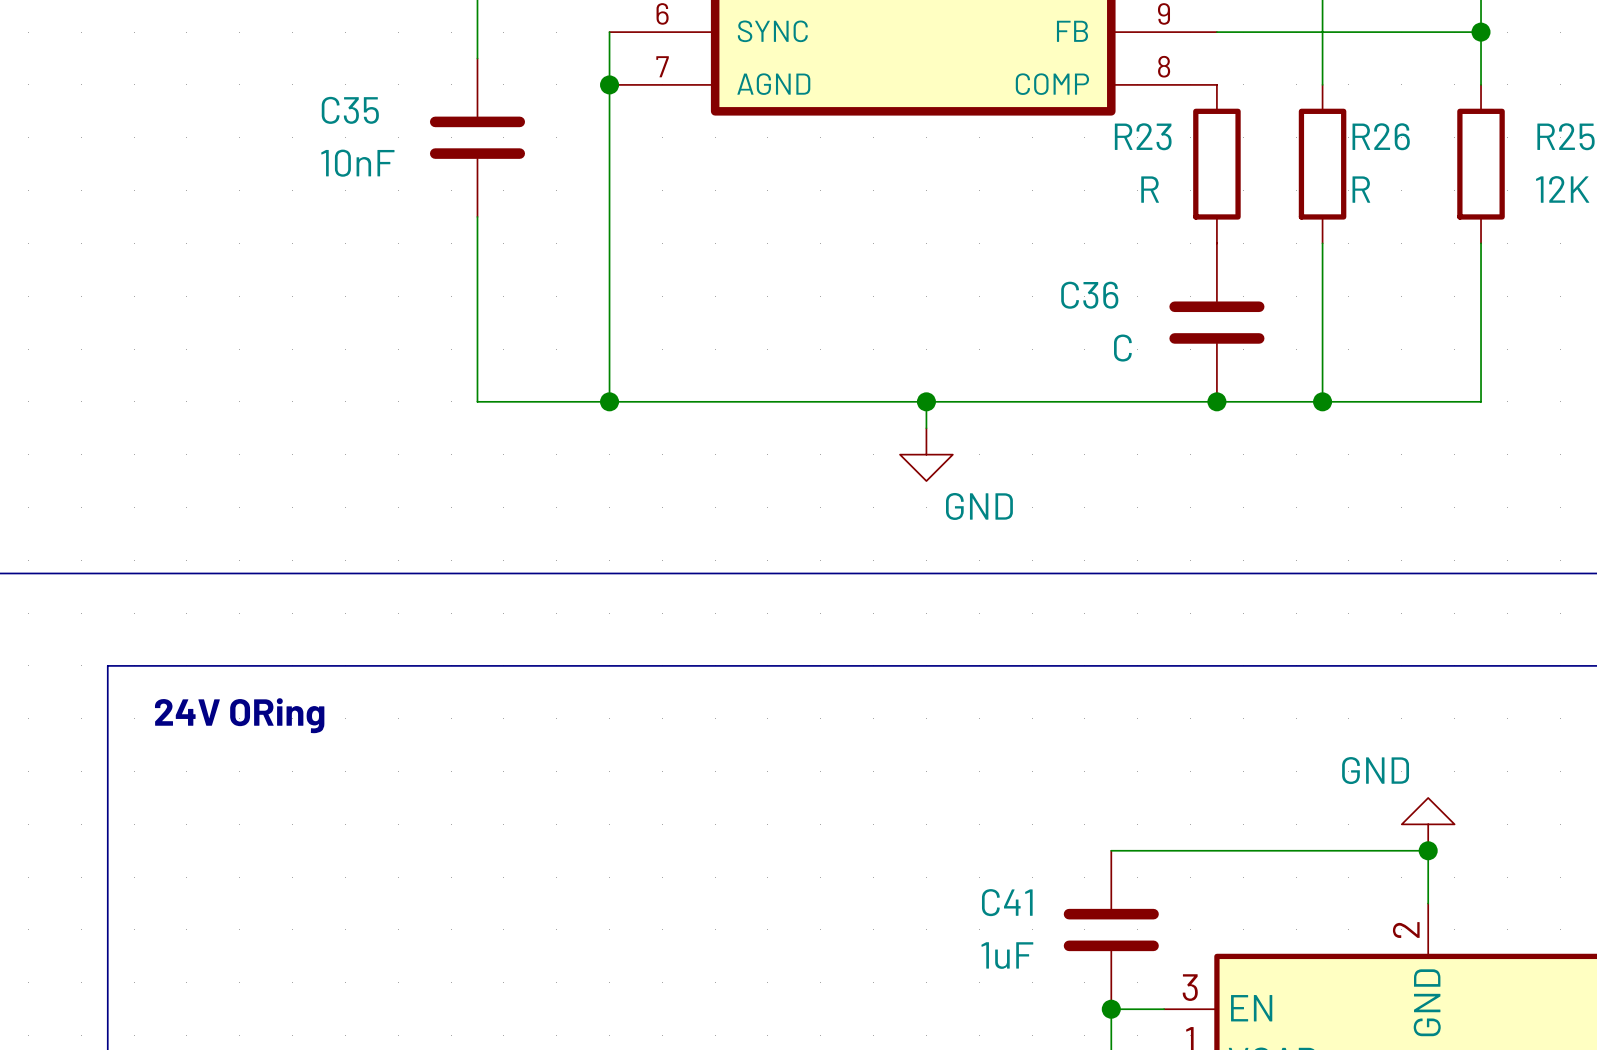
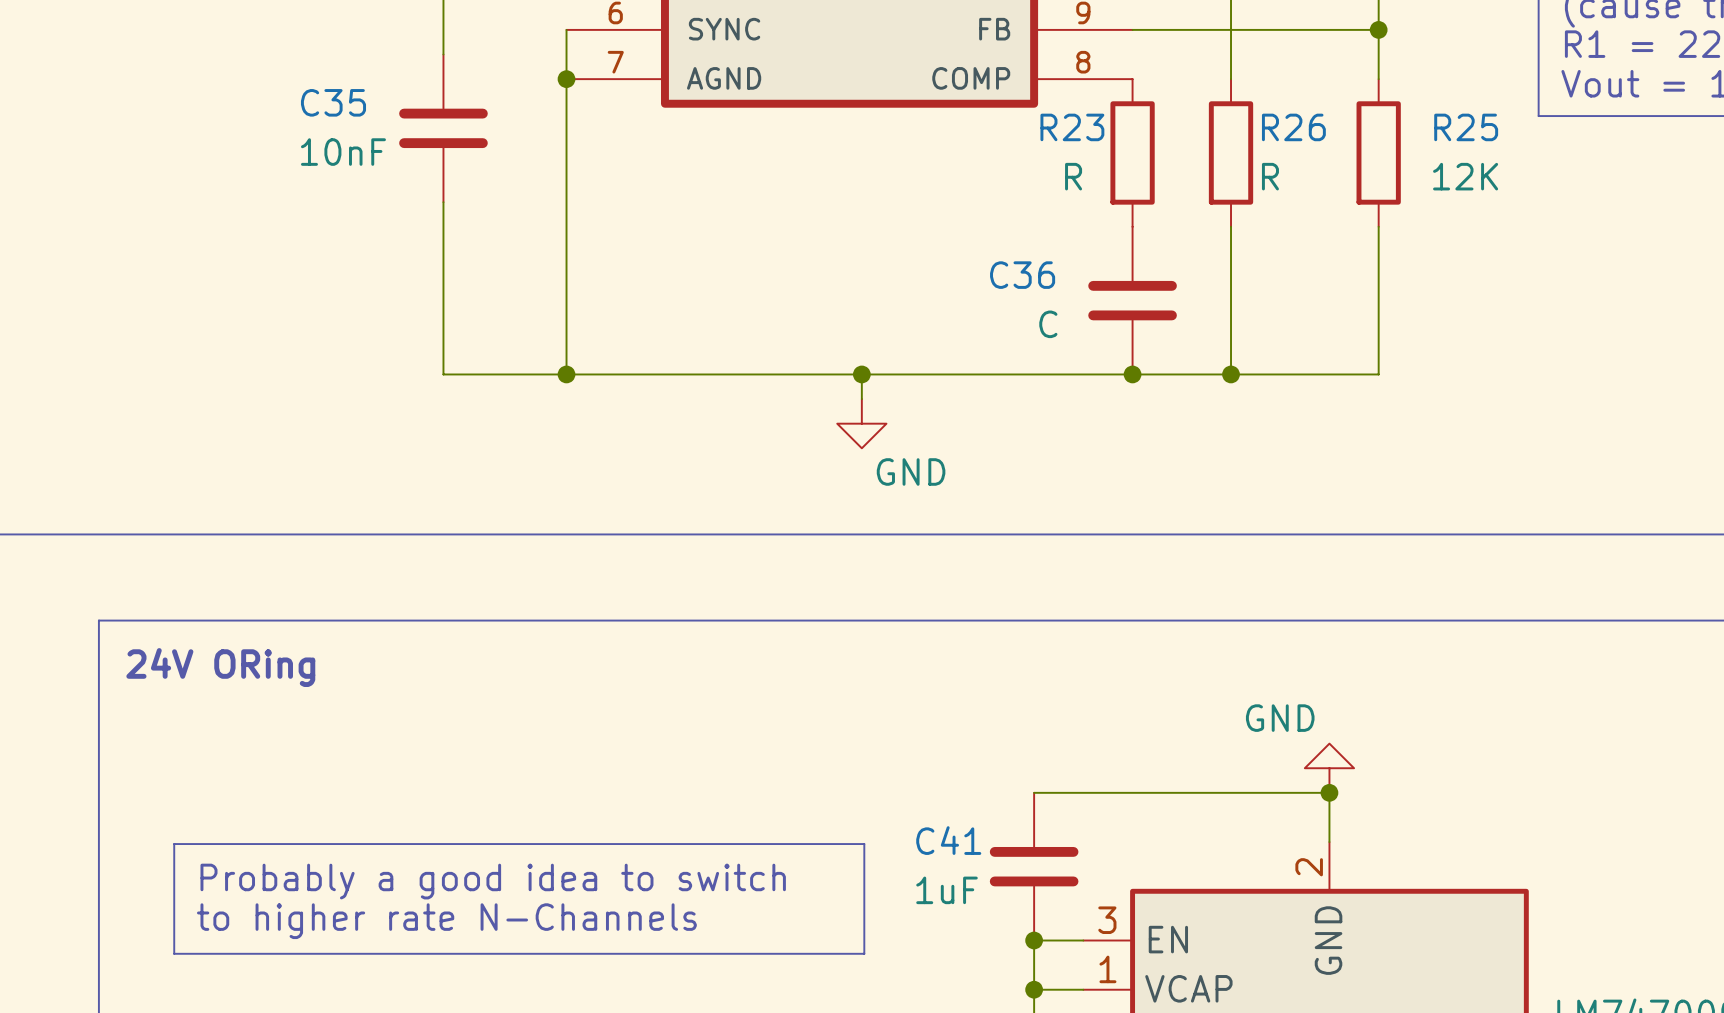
line: none -> (174, 844) (864, 844) (864, 953) (174, 953) (174, 844)
text: none -> Probably a good idea to switch (493, 881)
text: none -> to higher rate N-Channels (446, 921)

